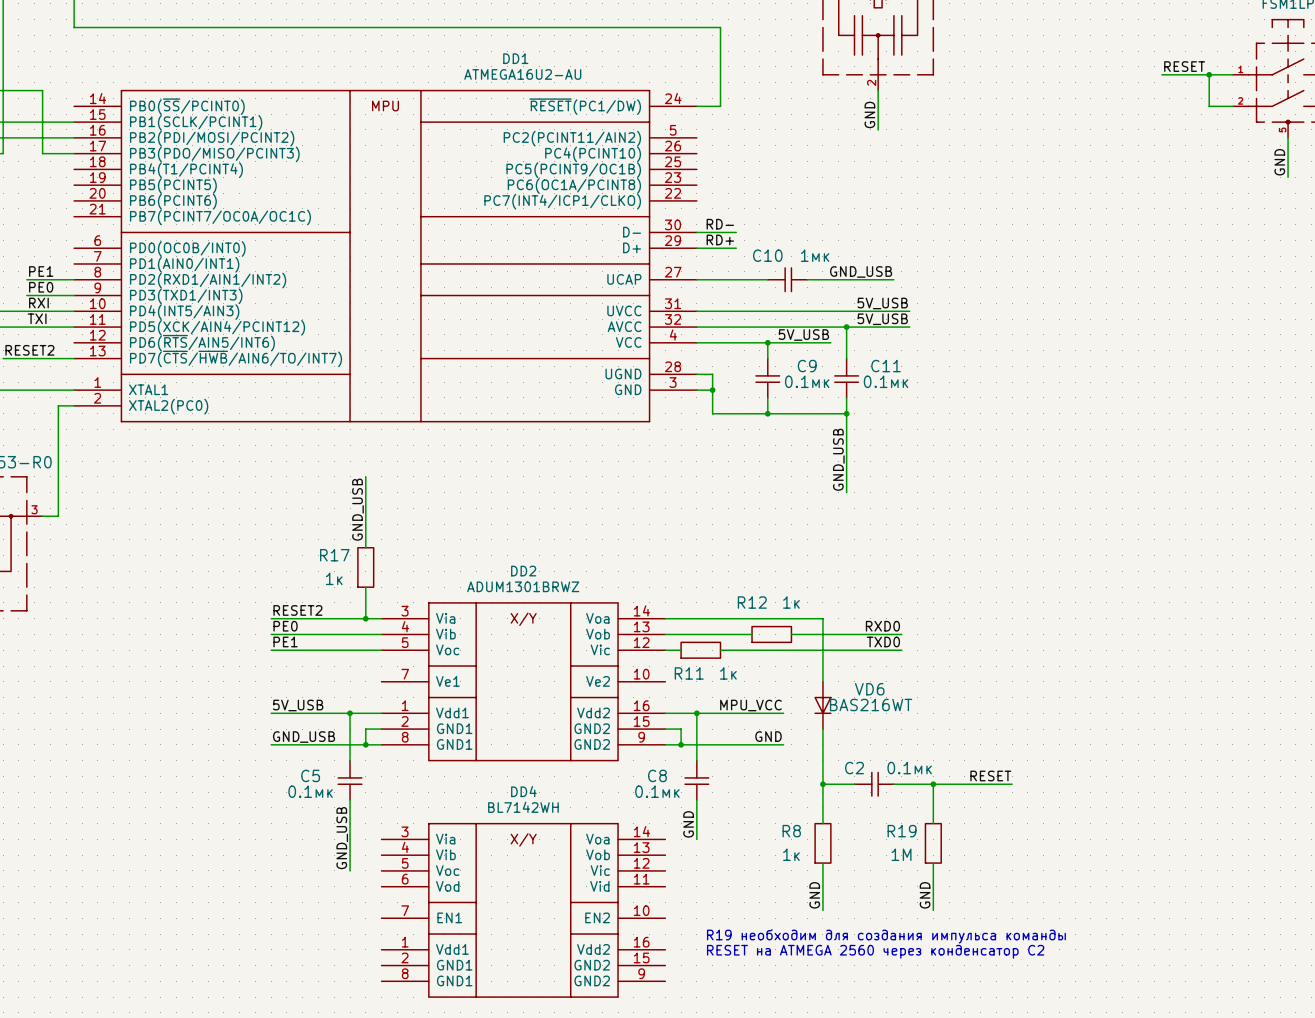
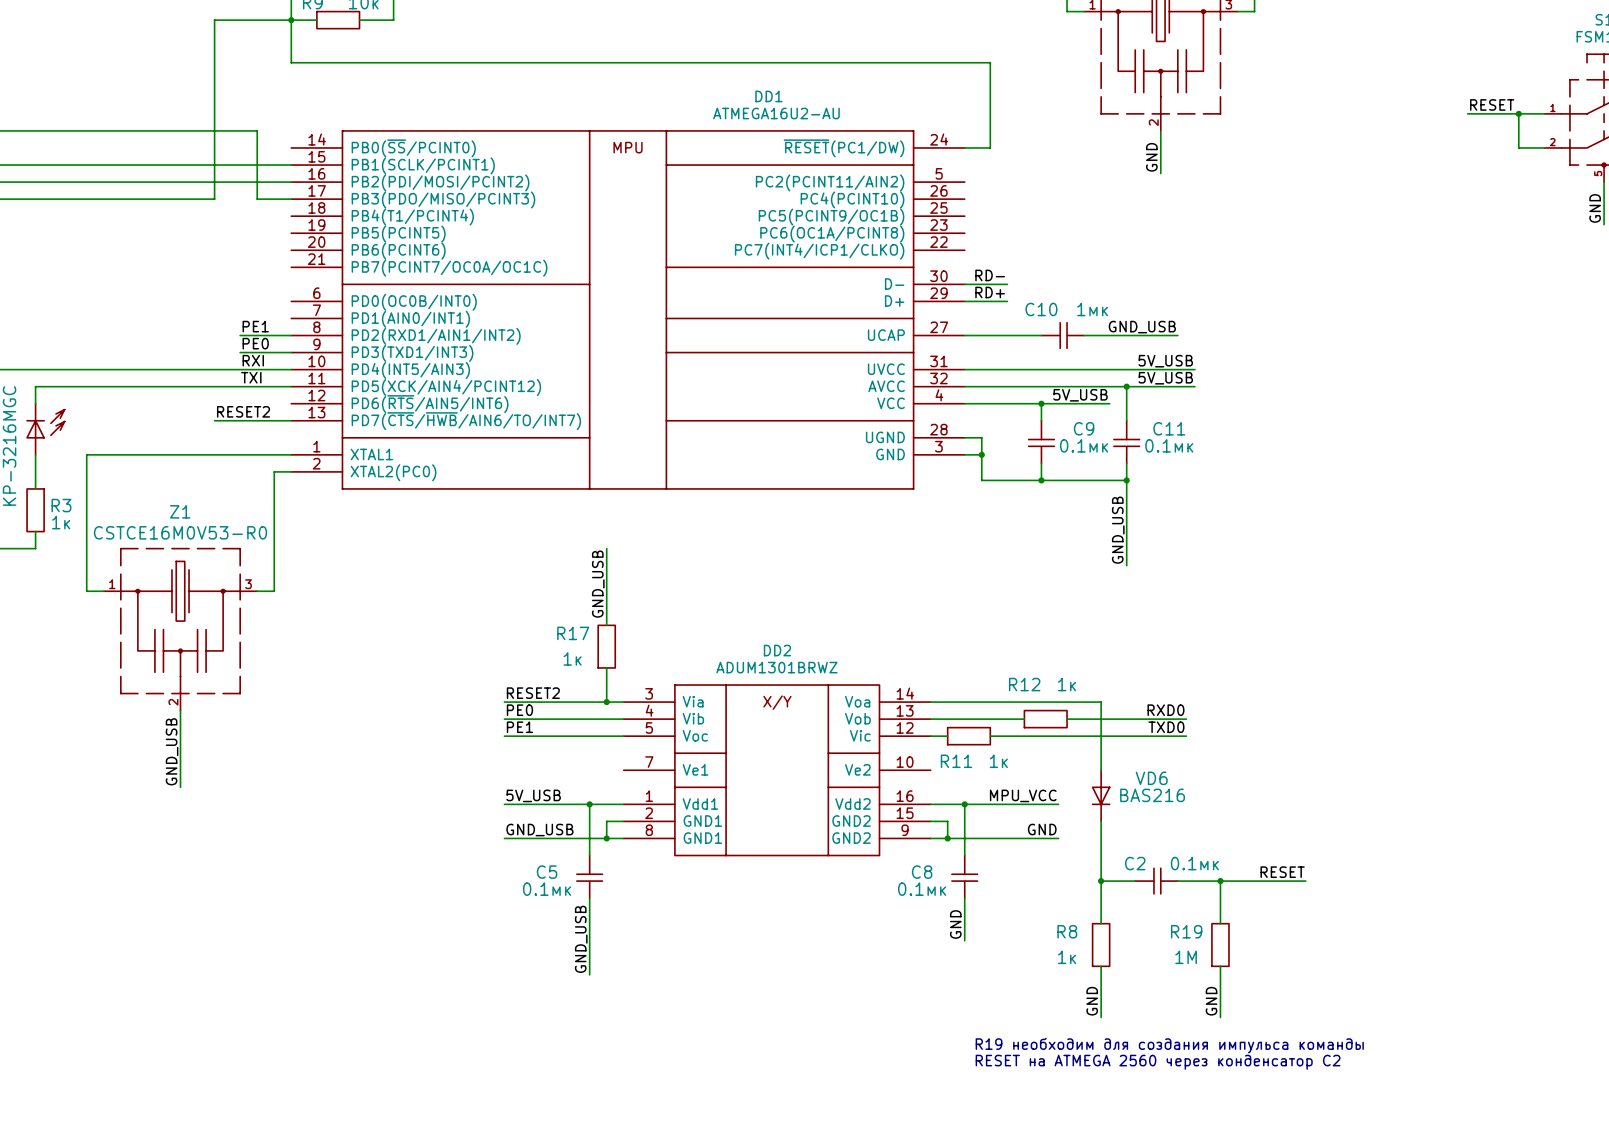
VD6 value: BAS216WT (871, 705) -> BAS216 (1152, 795)
DD4: BL7142WH (523, 910) -> none

